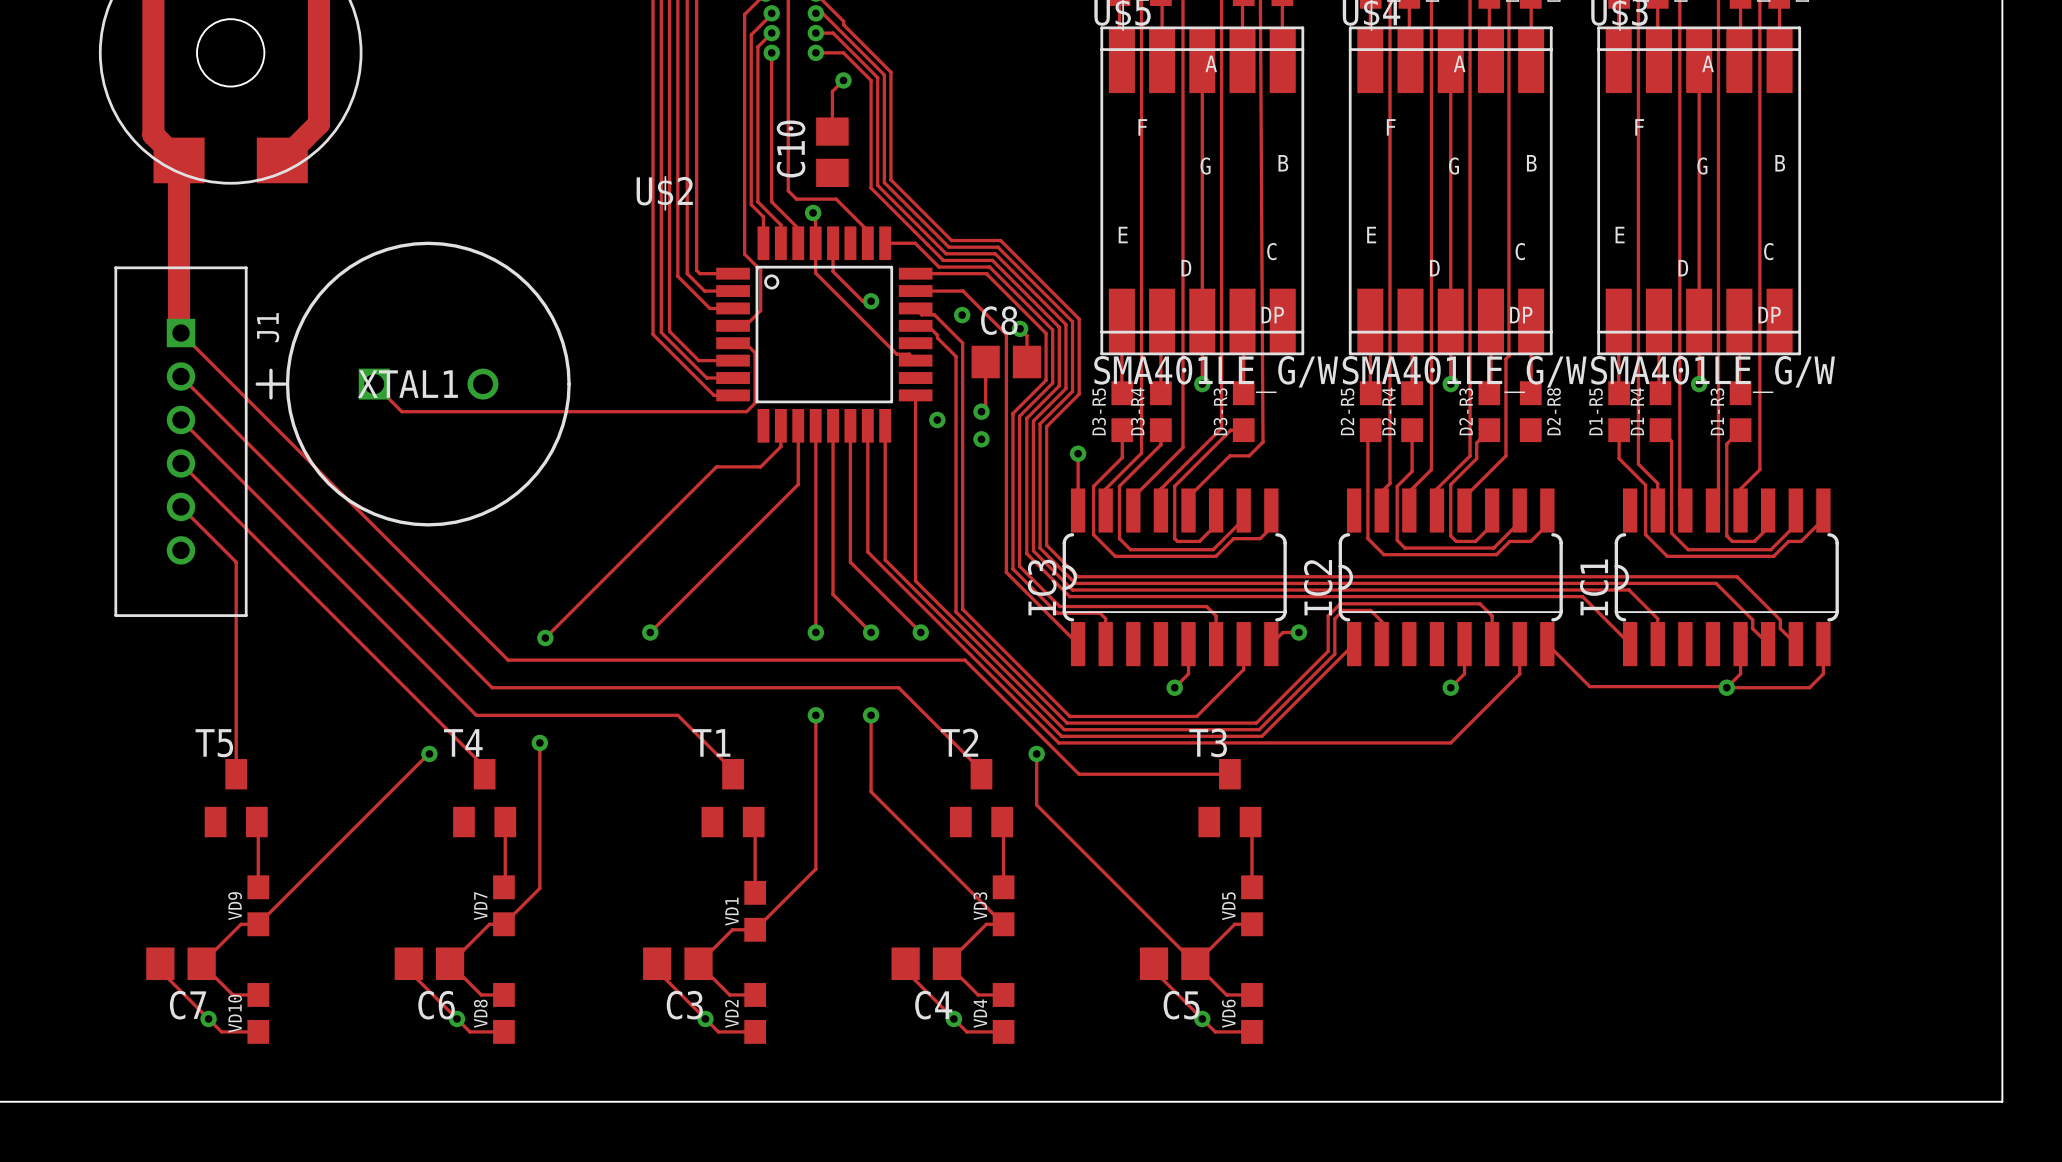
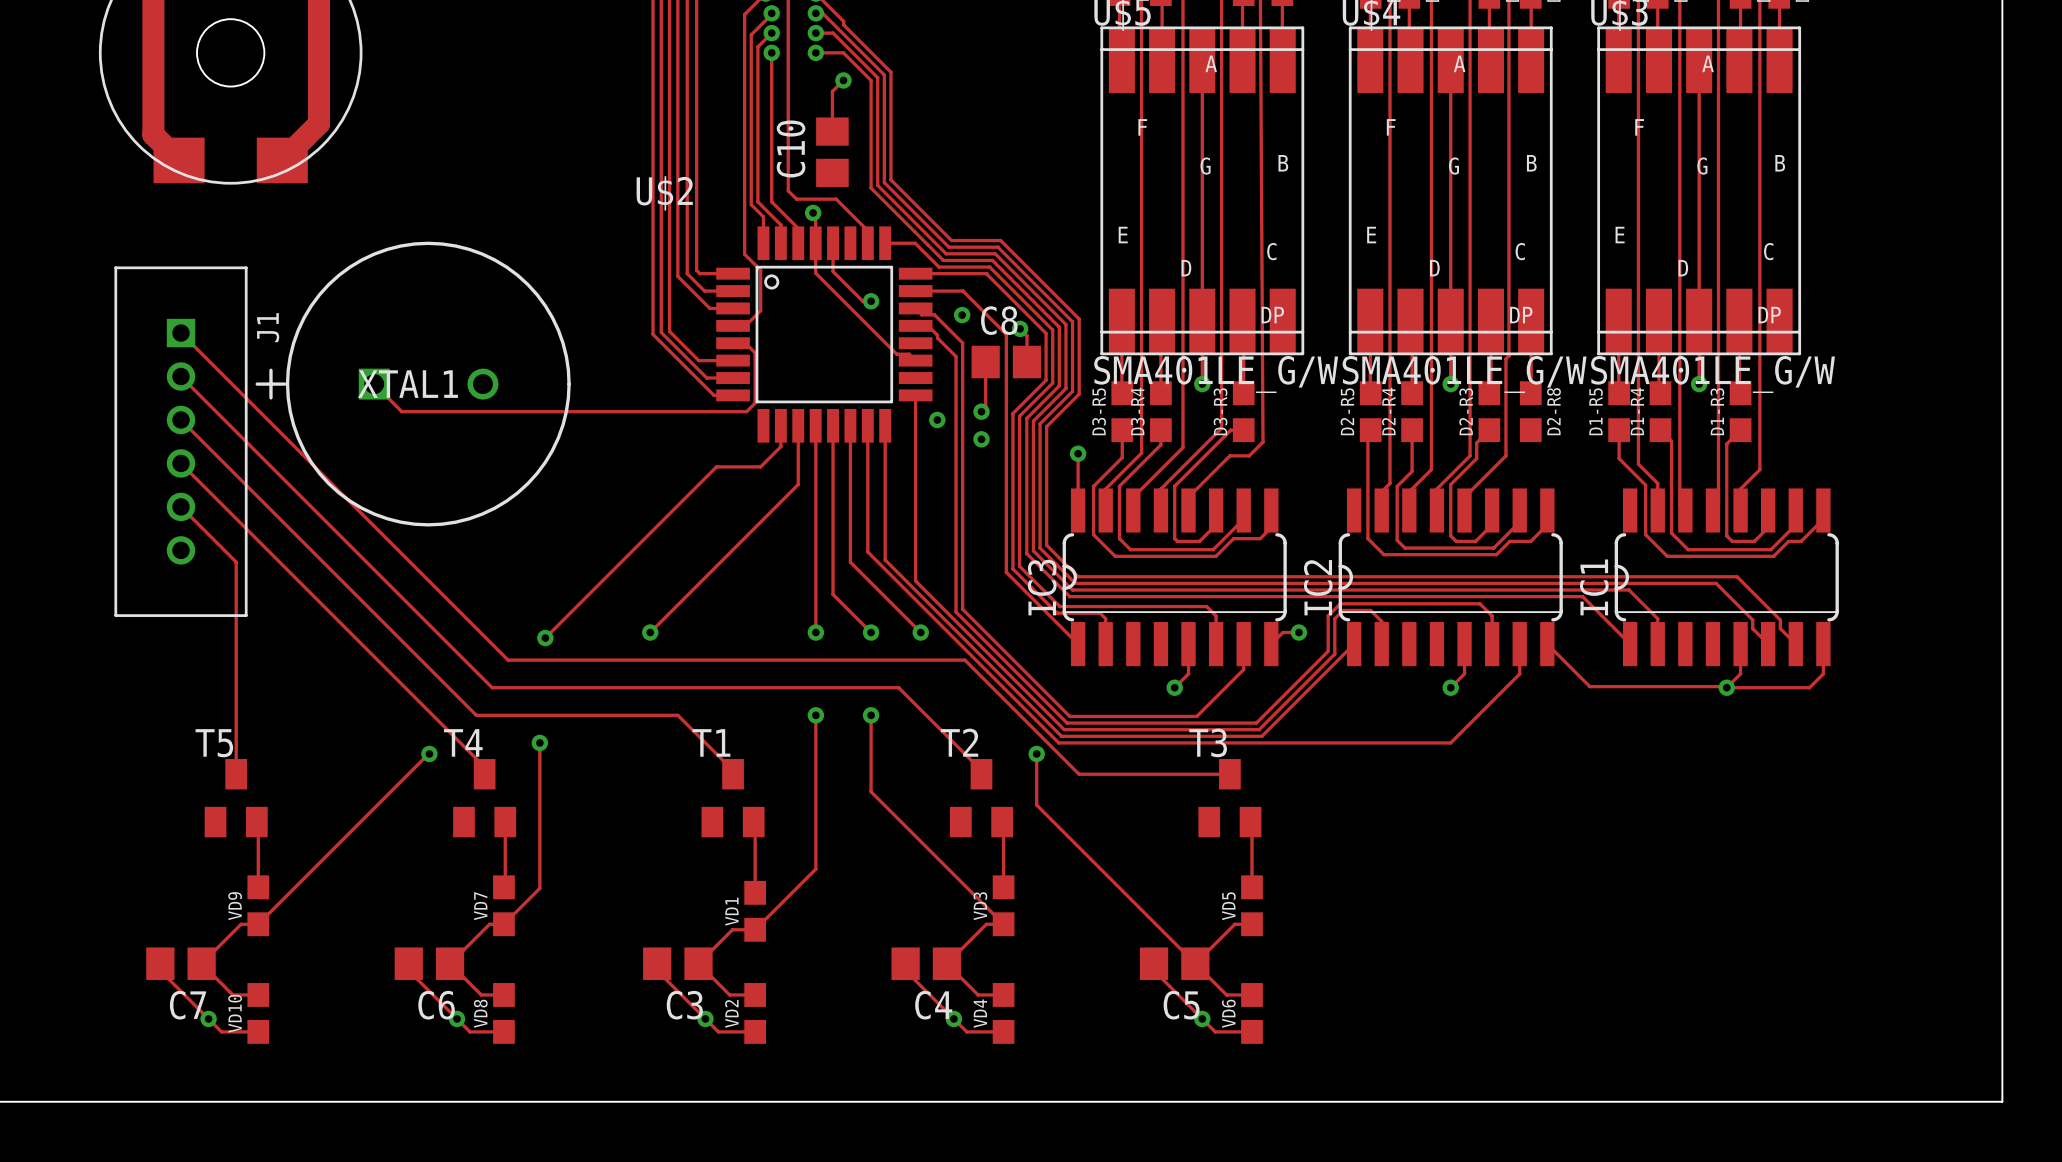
track: (179, 160) (179, 331) -> none

